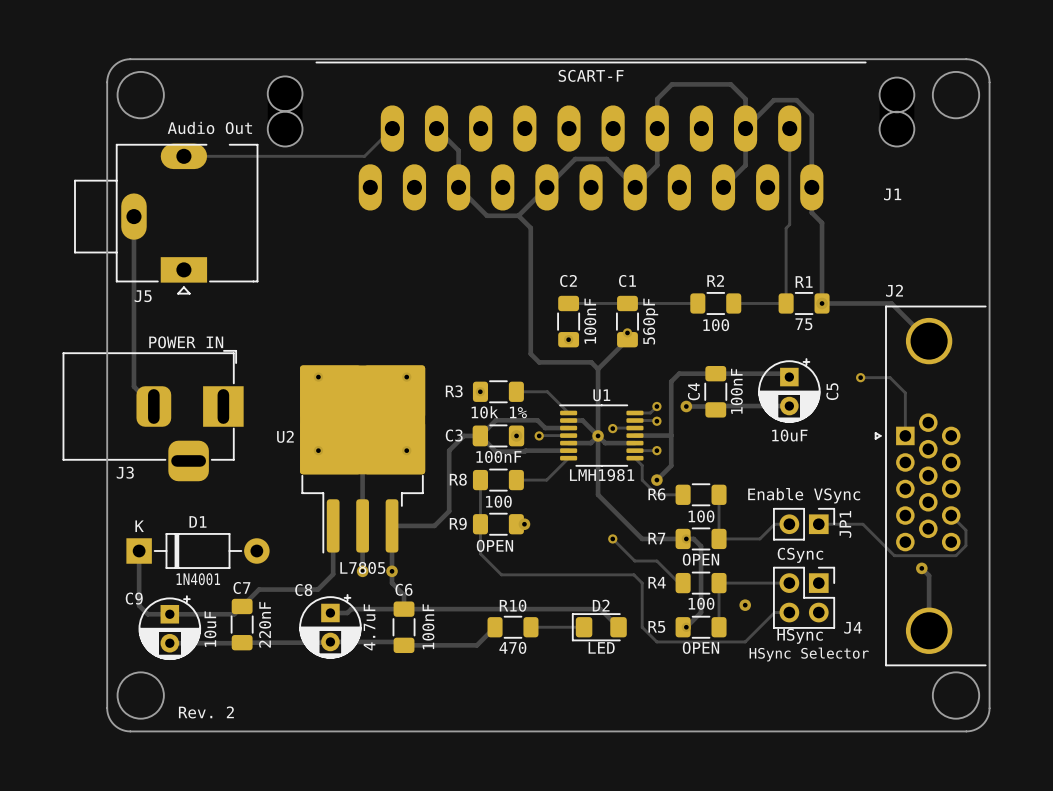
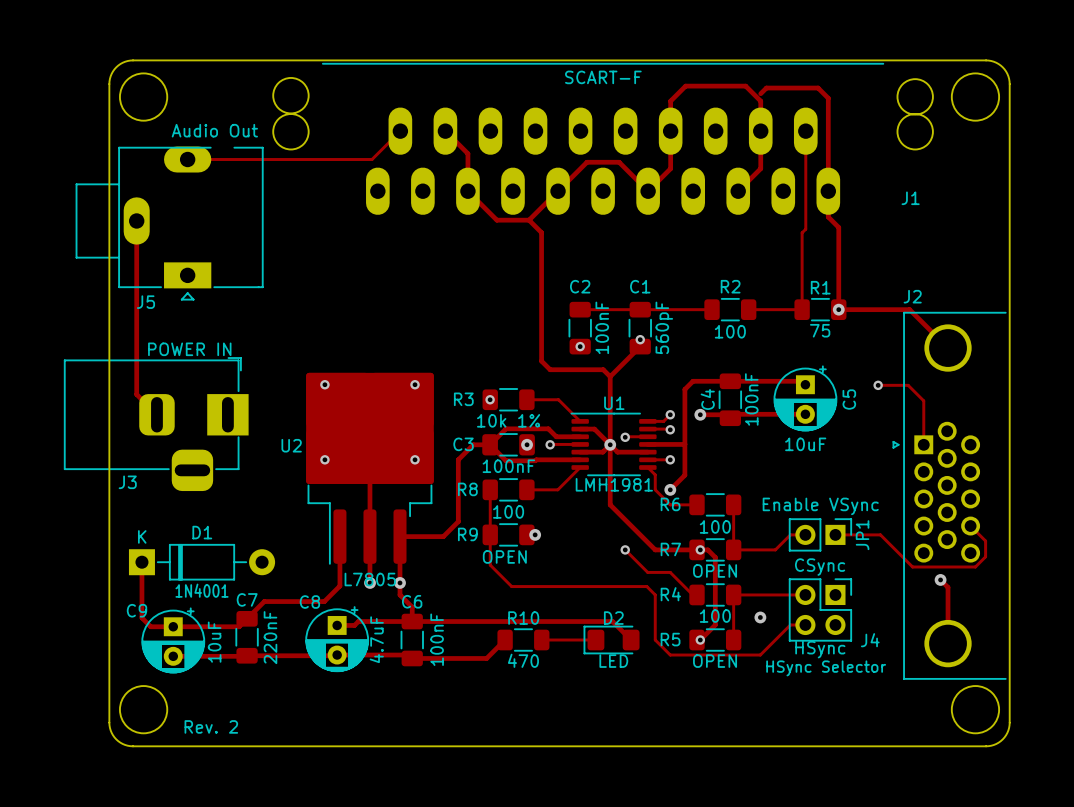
track: (811, 115) (796, 100) (773, 100) (745, 128) -> (828, 117) (828, 98) (818, 88) (766, 88) (760, 93)

